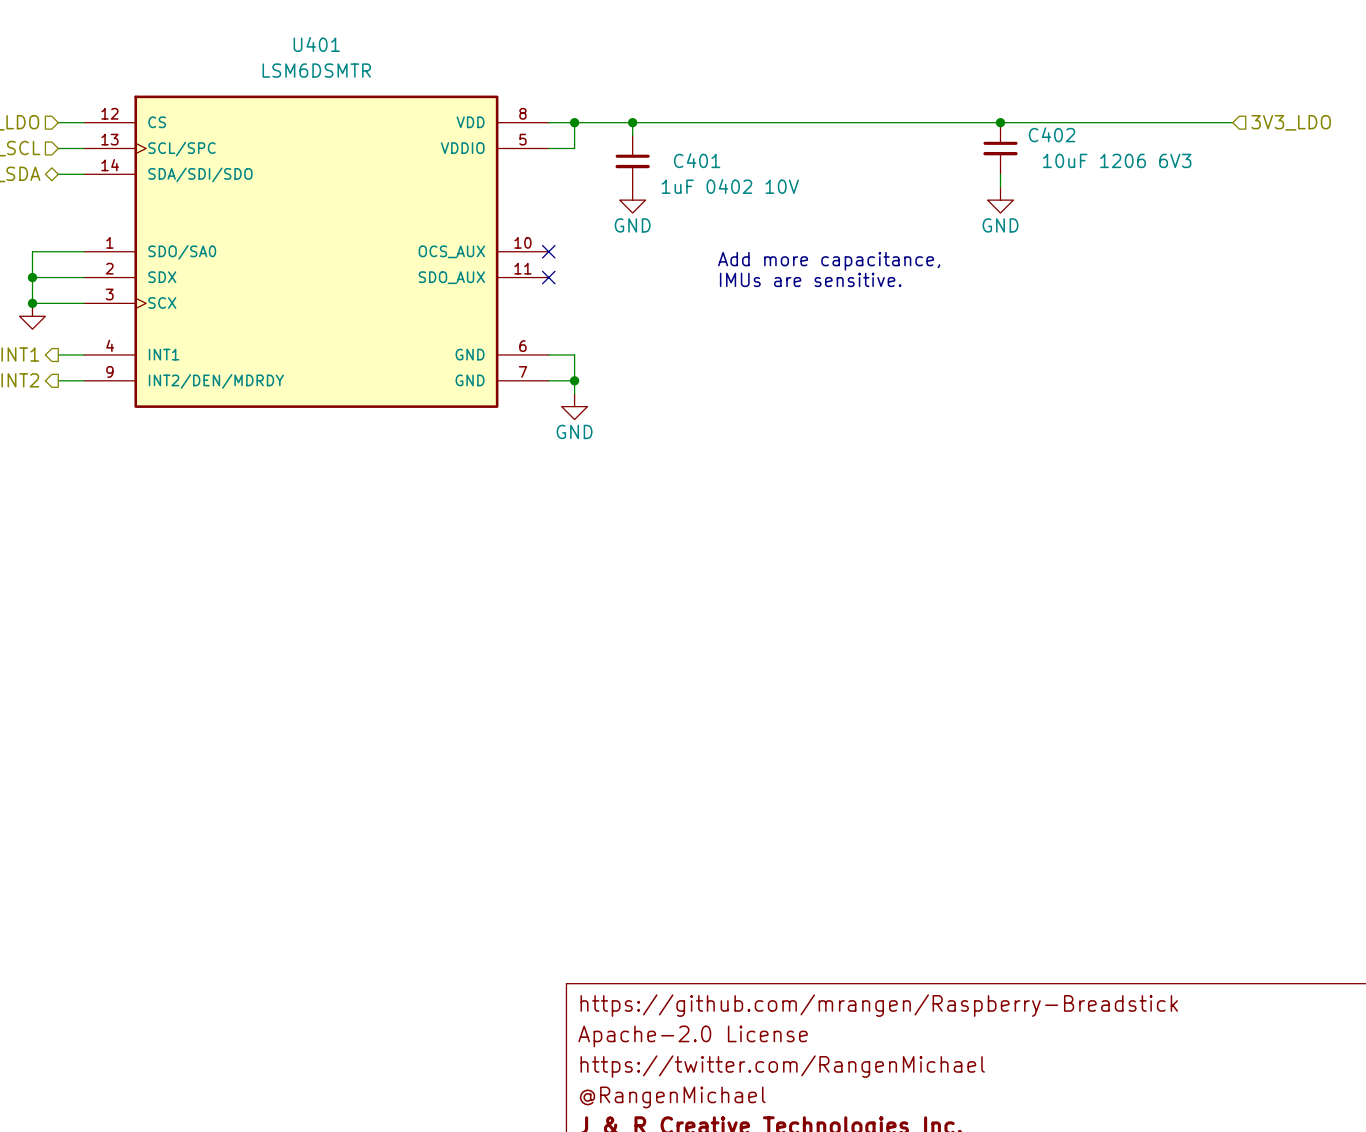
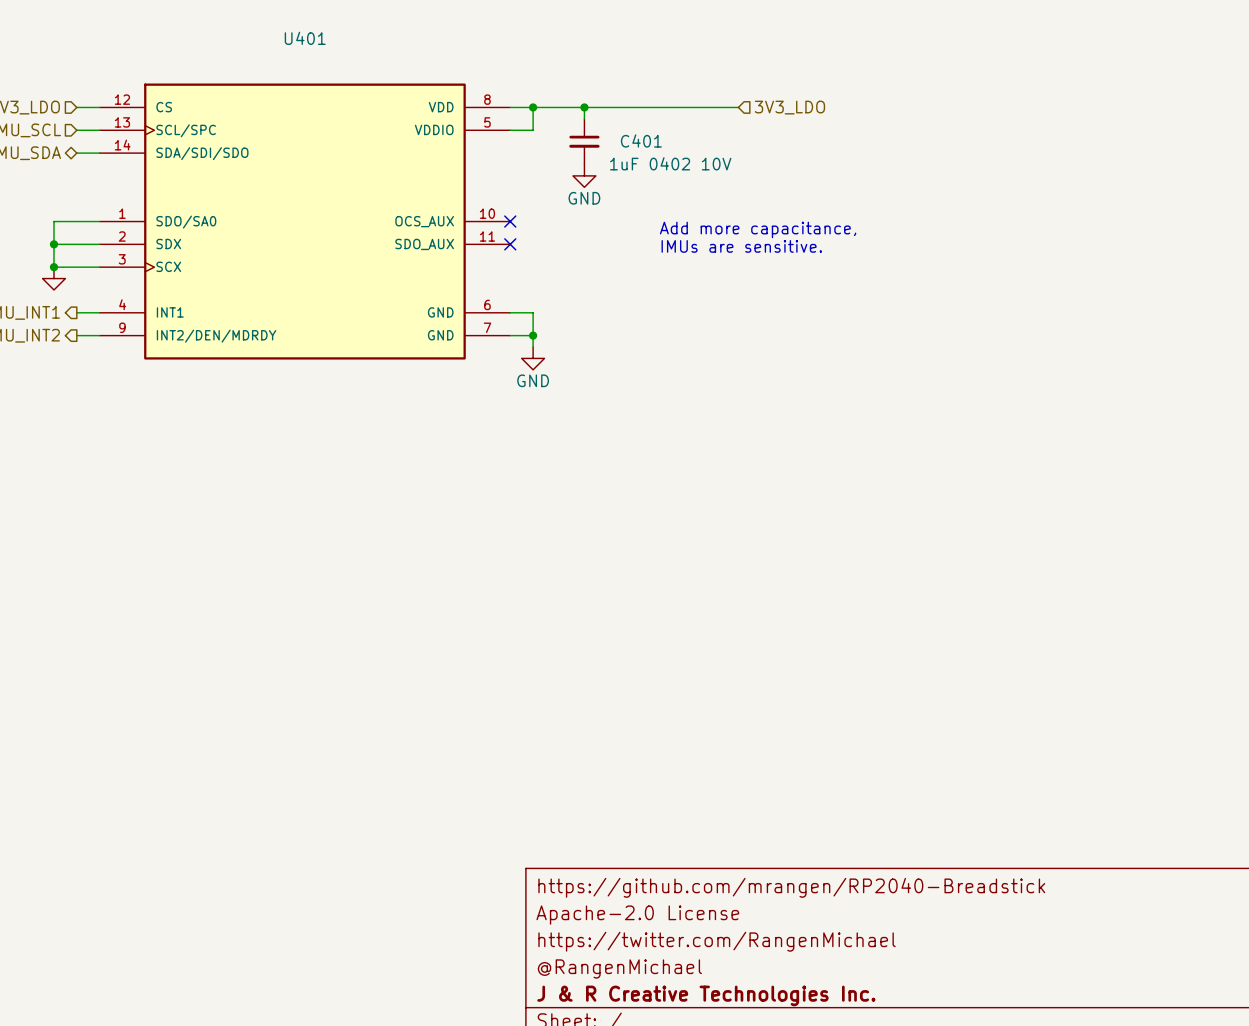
U401 value: LSM6DSMTR (316, 70) -> none
wire: (806, 122) (1232, 122) -> none
hierarchical label: none -> 3V3_LDO (789, 107)
junction: (1000, 122) -> none
hierarchical label: 3V3_LDO (1291, 122) -> none
C402: 10uF 1206 6V3 (1000, 148) -> none
wire: (1000, 174) (1000, 187) -> none
power symbol: GND (1000, 200) -> none
title block: https://github.com/mrangen/Raspberry-Breadstick (879, 1005) -> https://github.com/mrangen/RP2040-Breadstick (791, 887)

